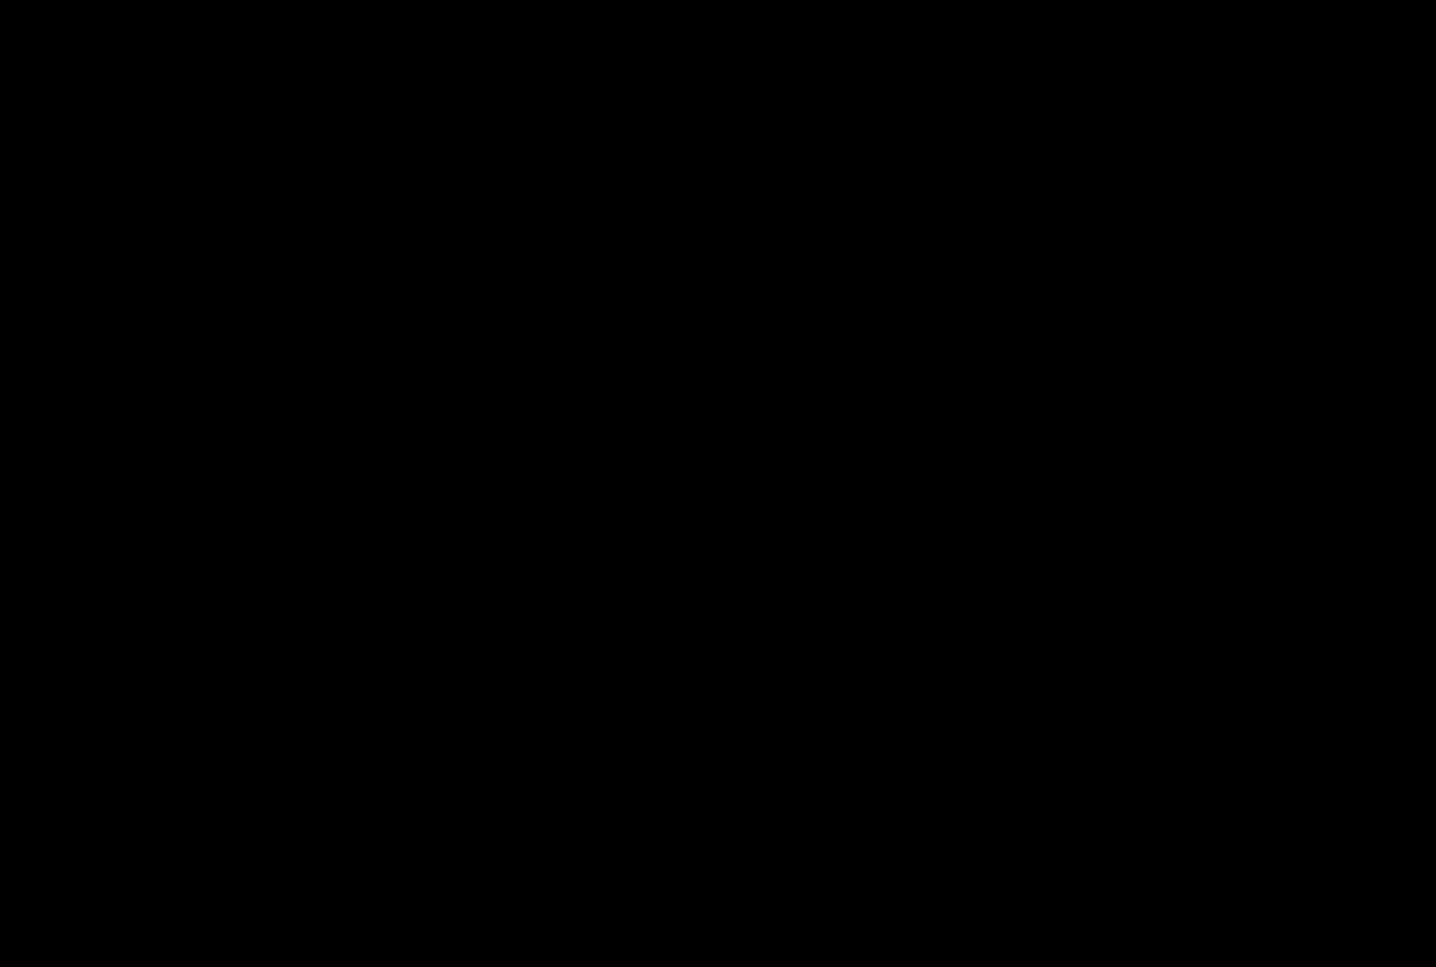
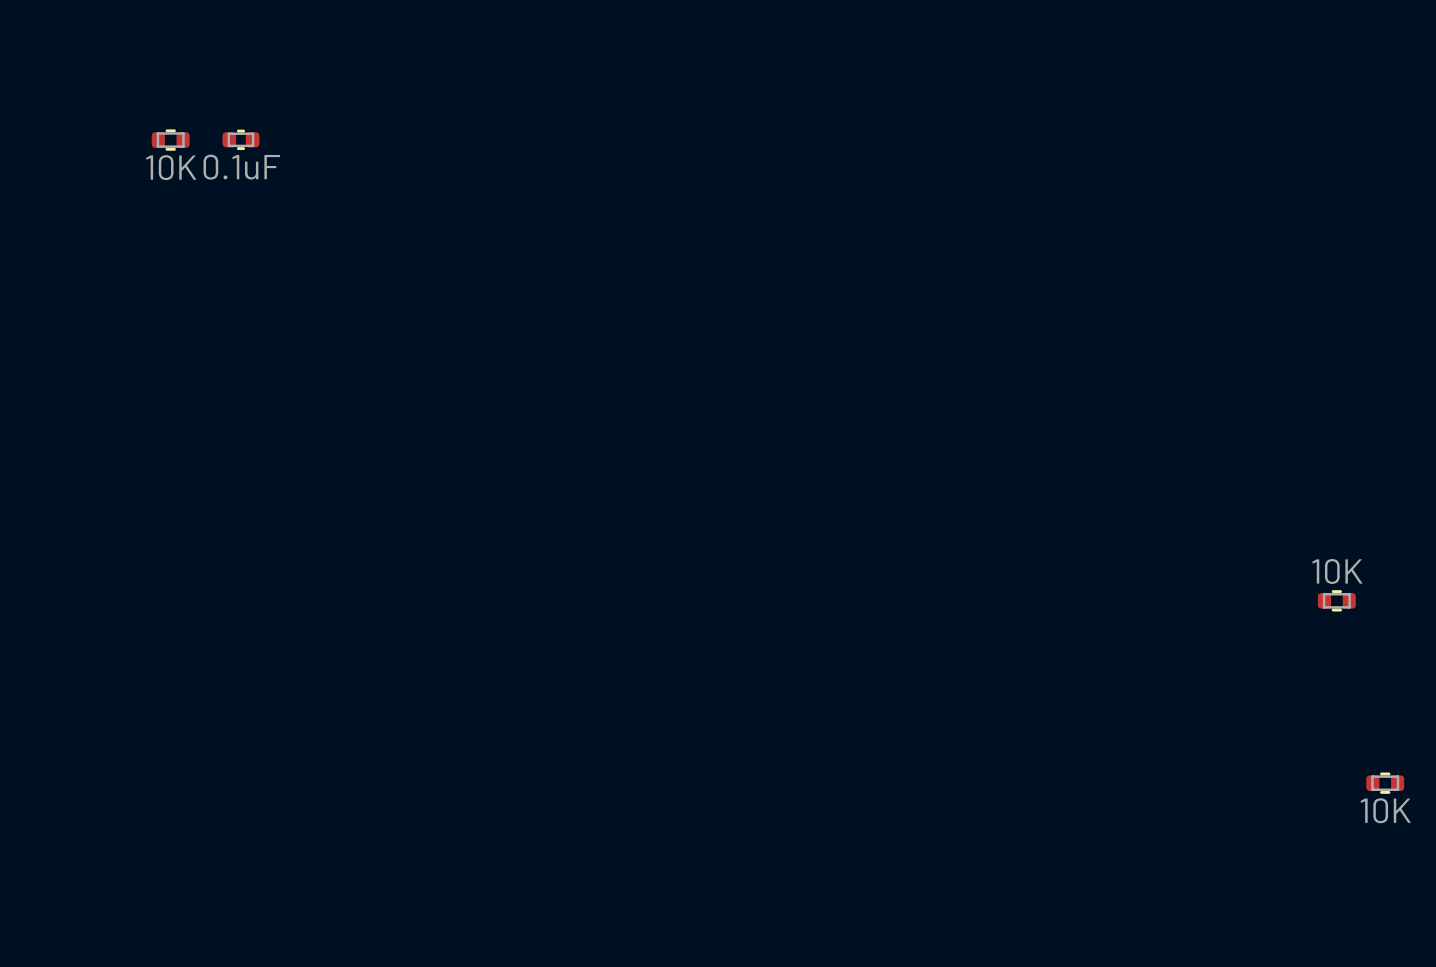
part: none -> 0.1uF (240, 139)
part: none -> 10K (170, 140)
part: none -> 10K (1336, 600)
part: none -> 10K (1385, 783)

